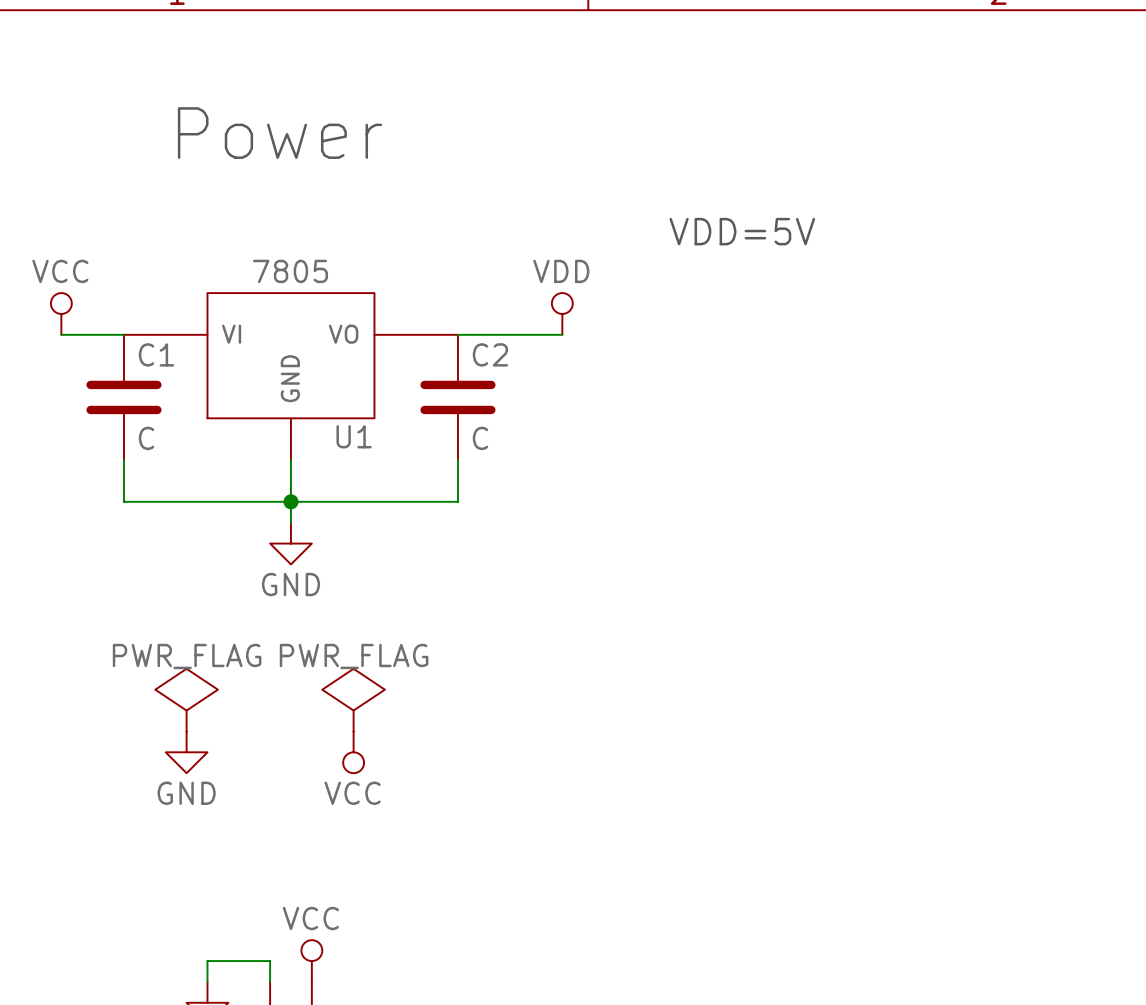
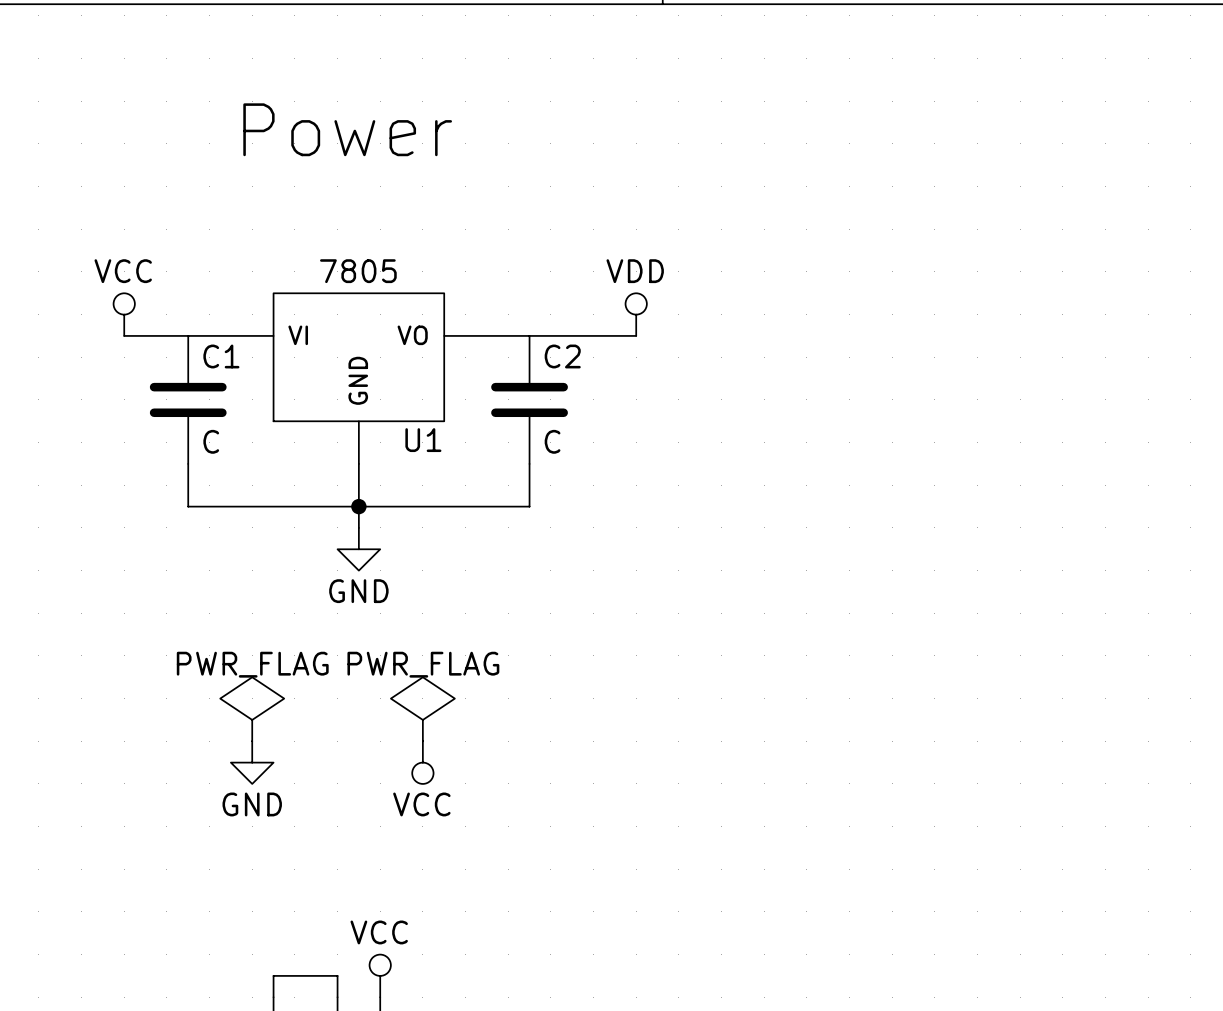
text: VDD=5V (742, 231) -> none

